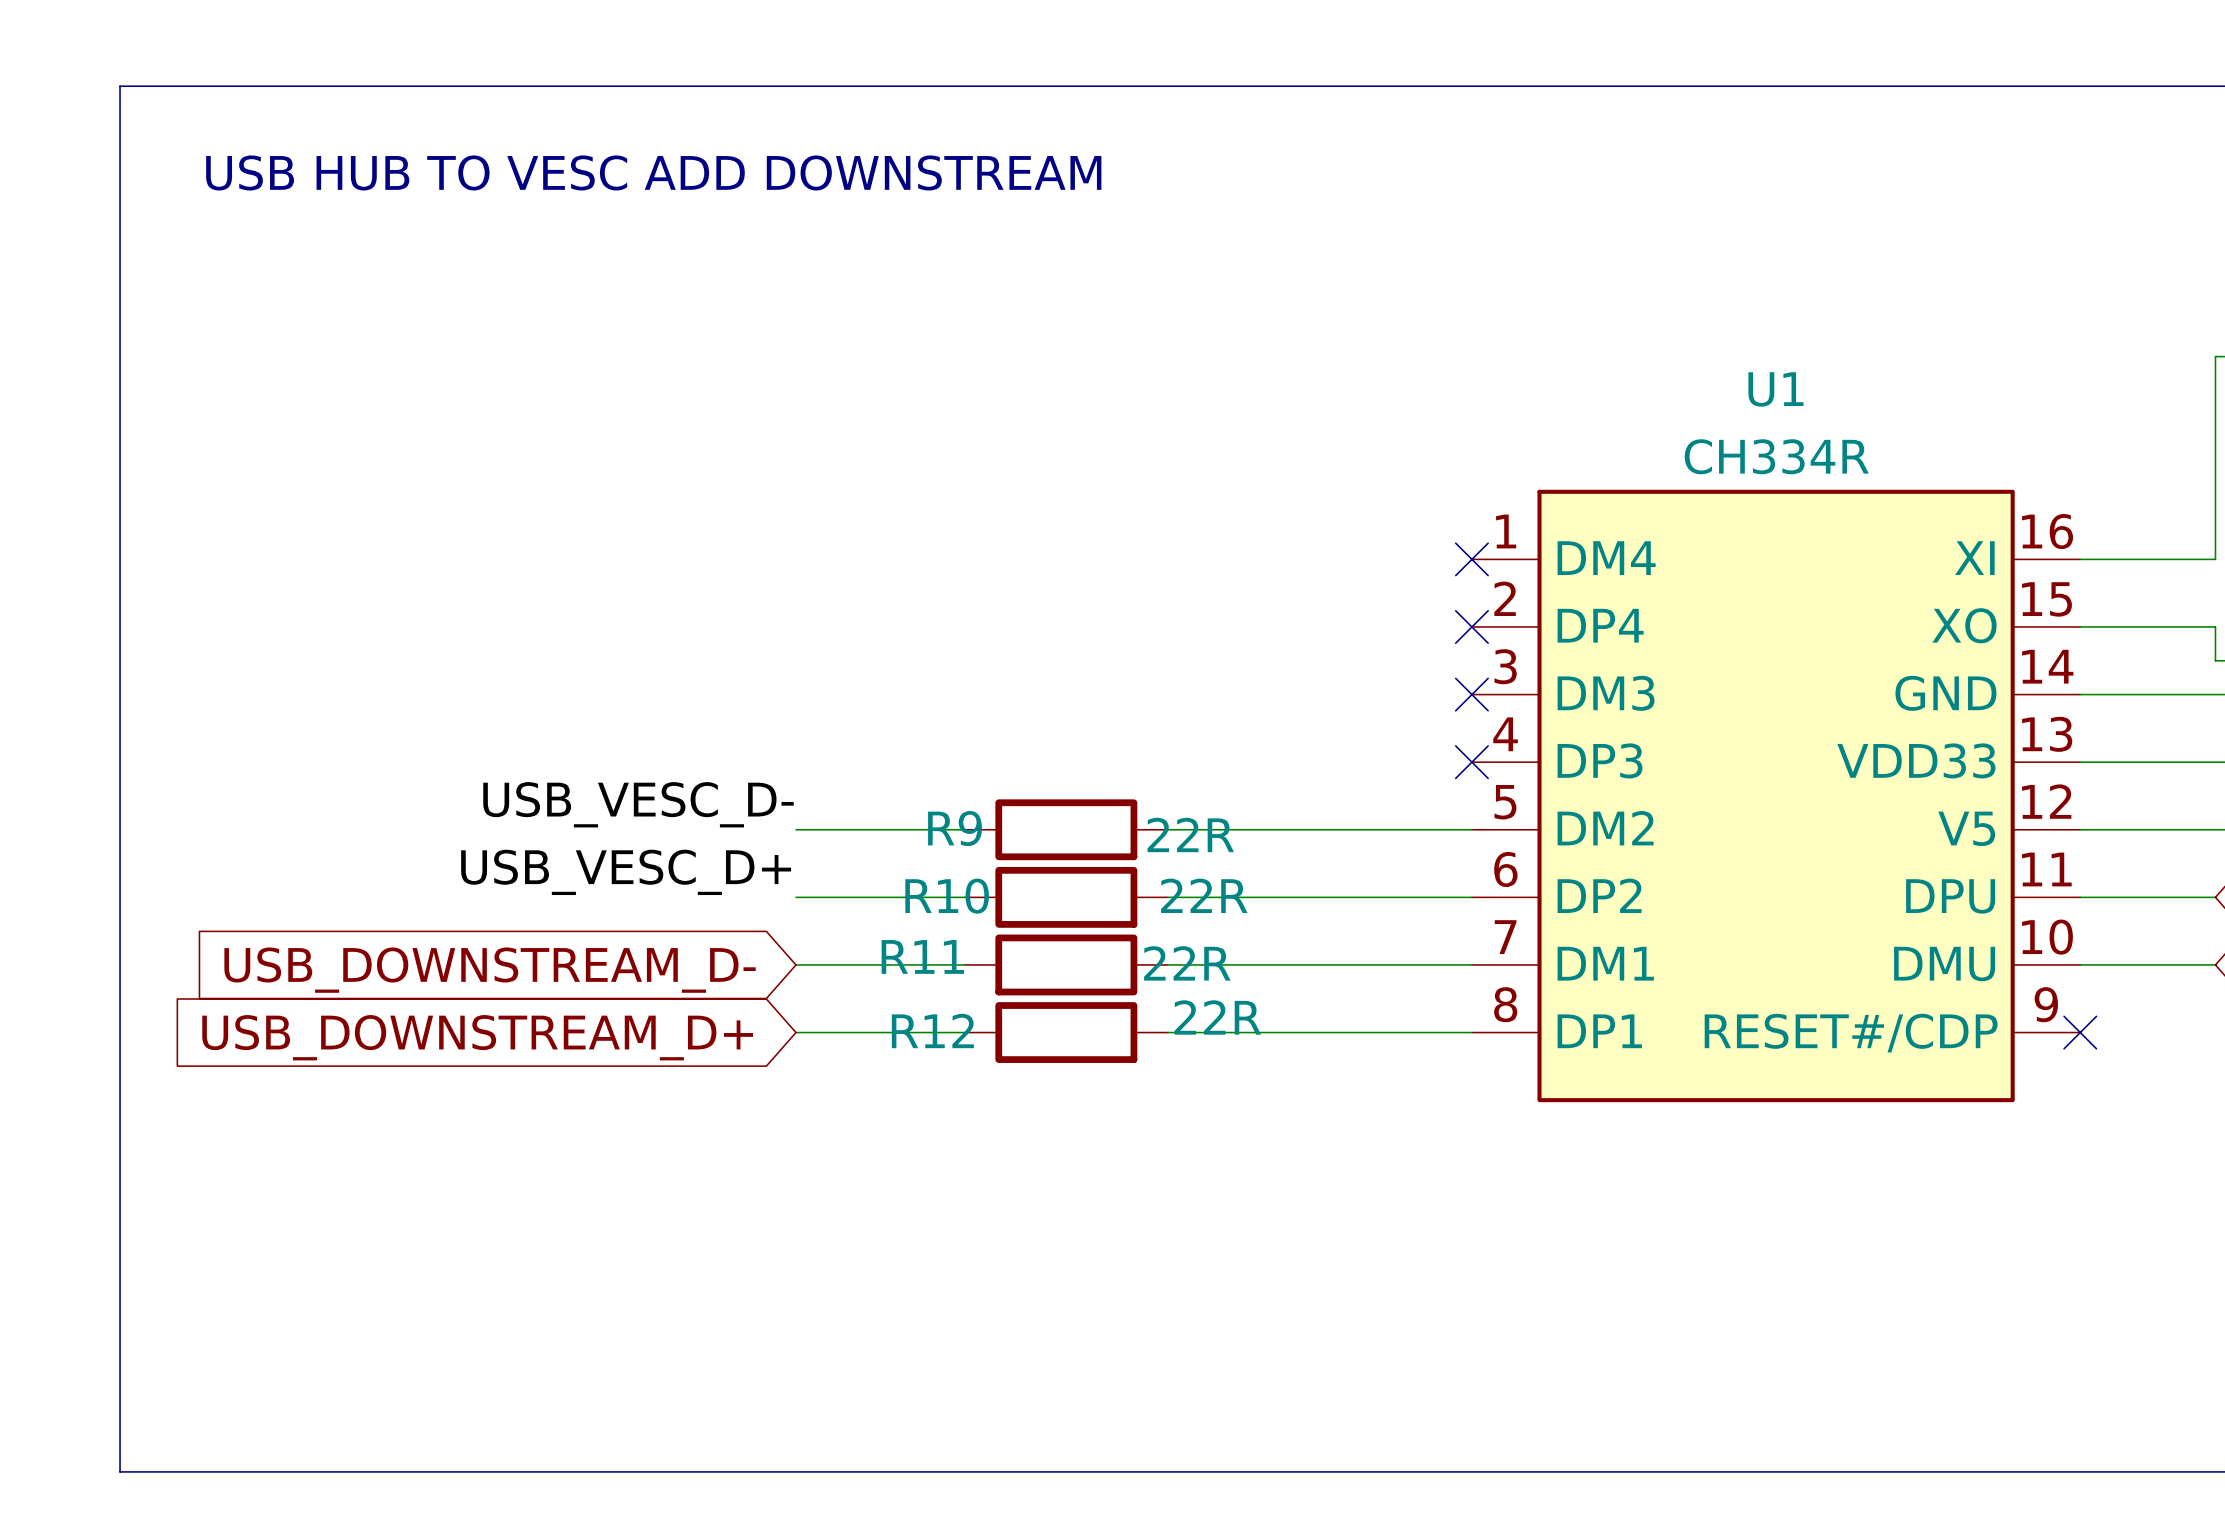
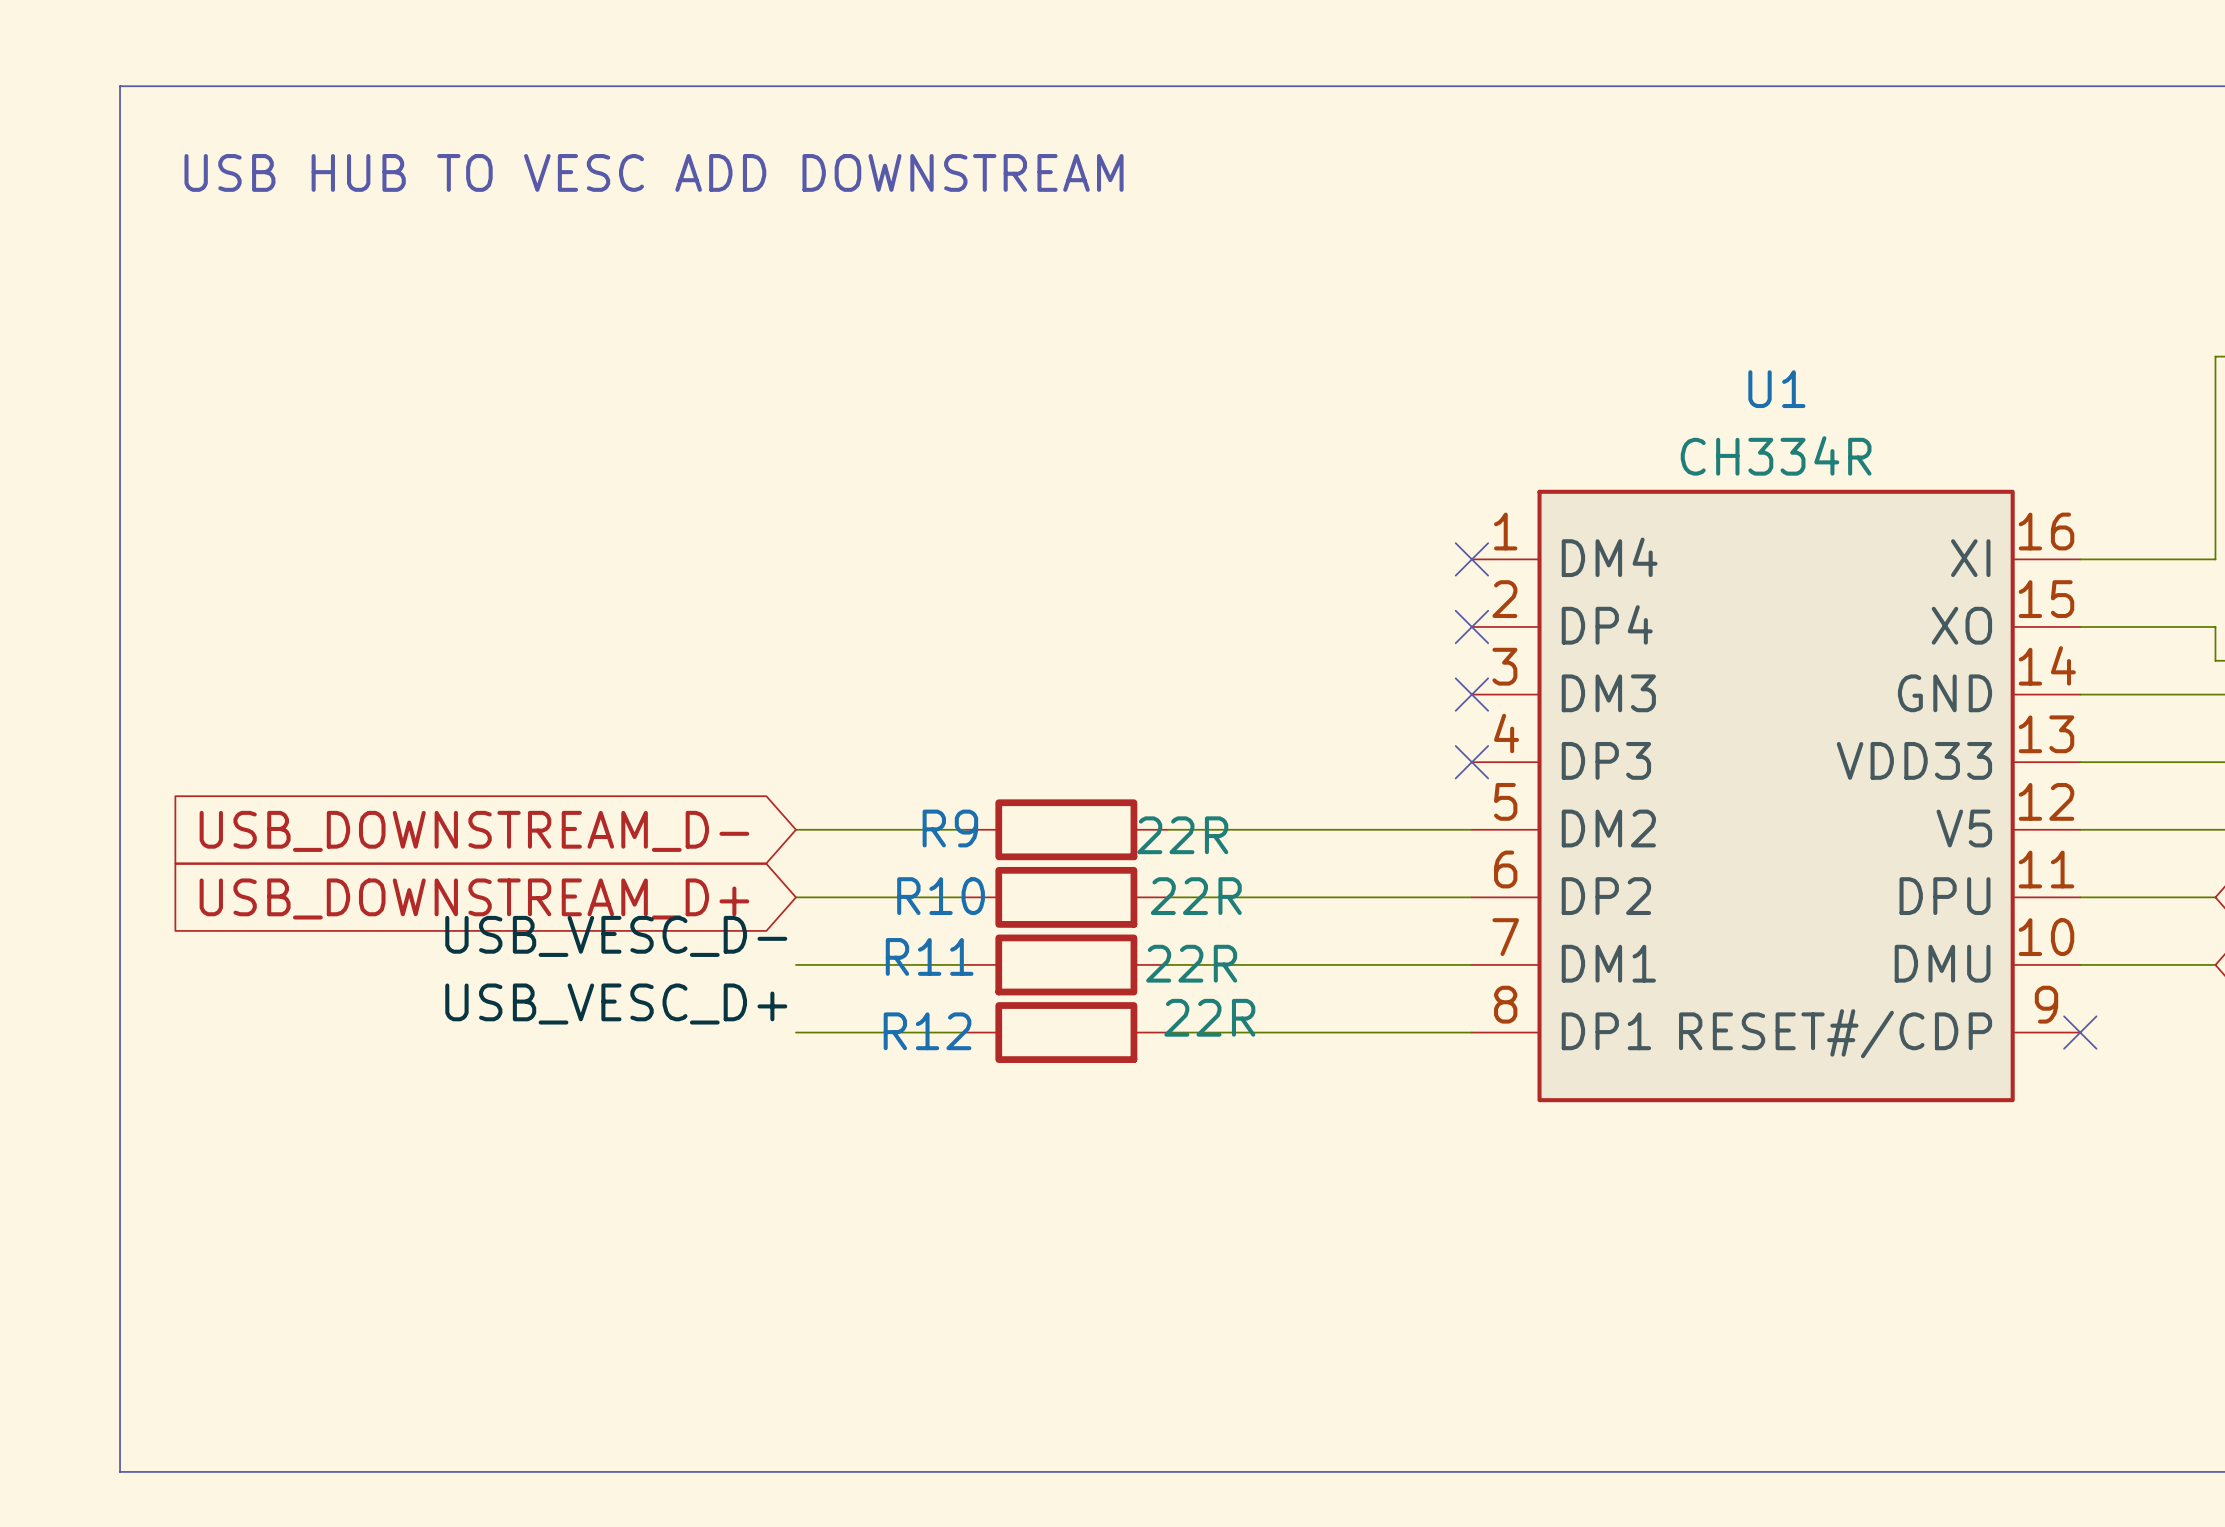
label position: USB_VESC_D- (638, 804) -> USB_VESC_D- (616, 936)
label position: USB_VESC_D+ (626, 872) -> USB_VESC_D+ (616, 1004)
global label position: USB_DOWNSTREAM_D- (490, 970) -> USB_DOWNSTREAM_D- (474, 831)
global label position: USB_DOWNSTREAM_D+ (477, 1037) -> USB_DOWNSTREAM_D+ (474, 898)

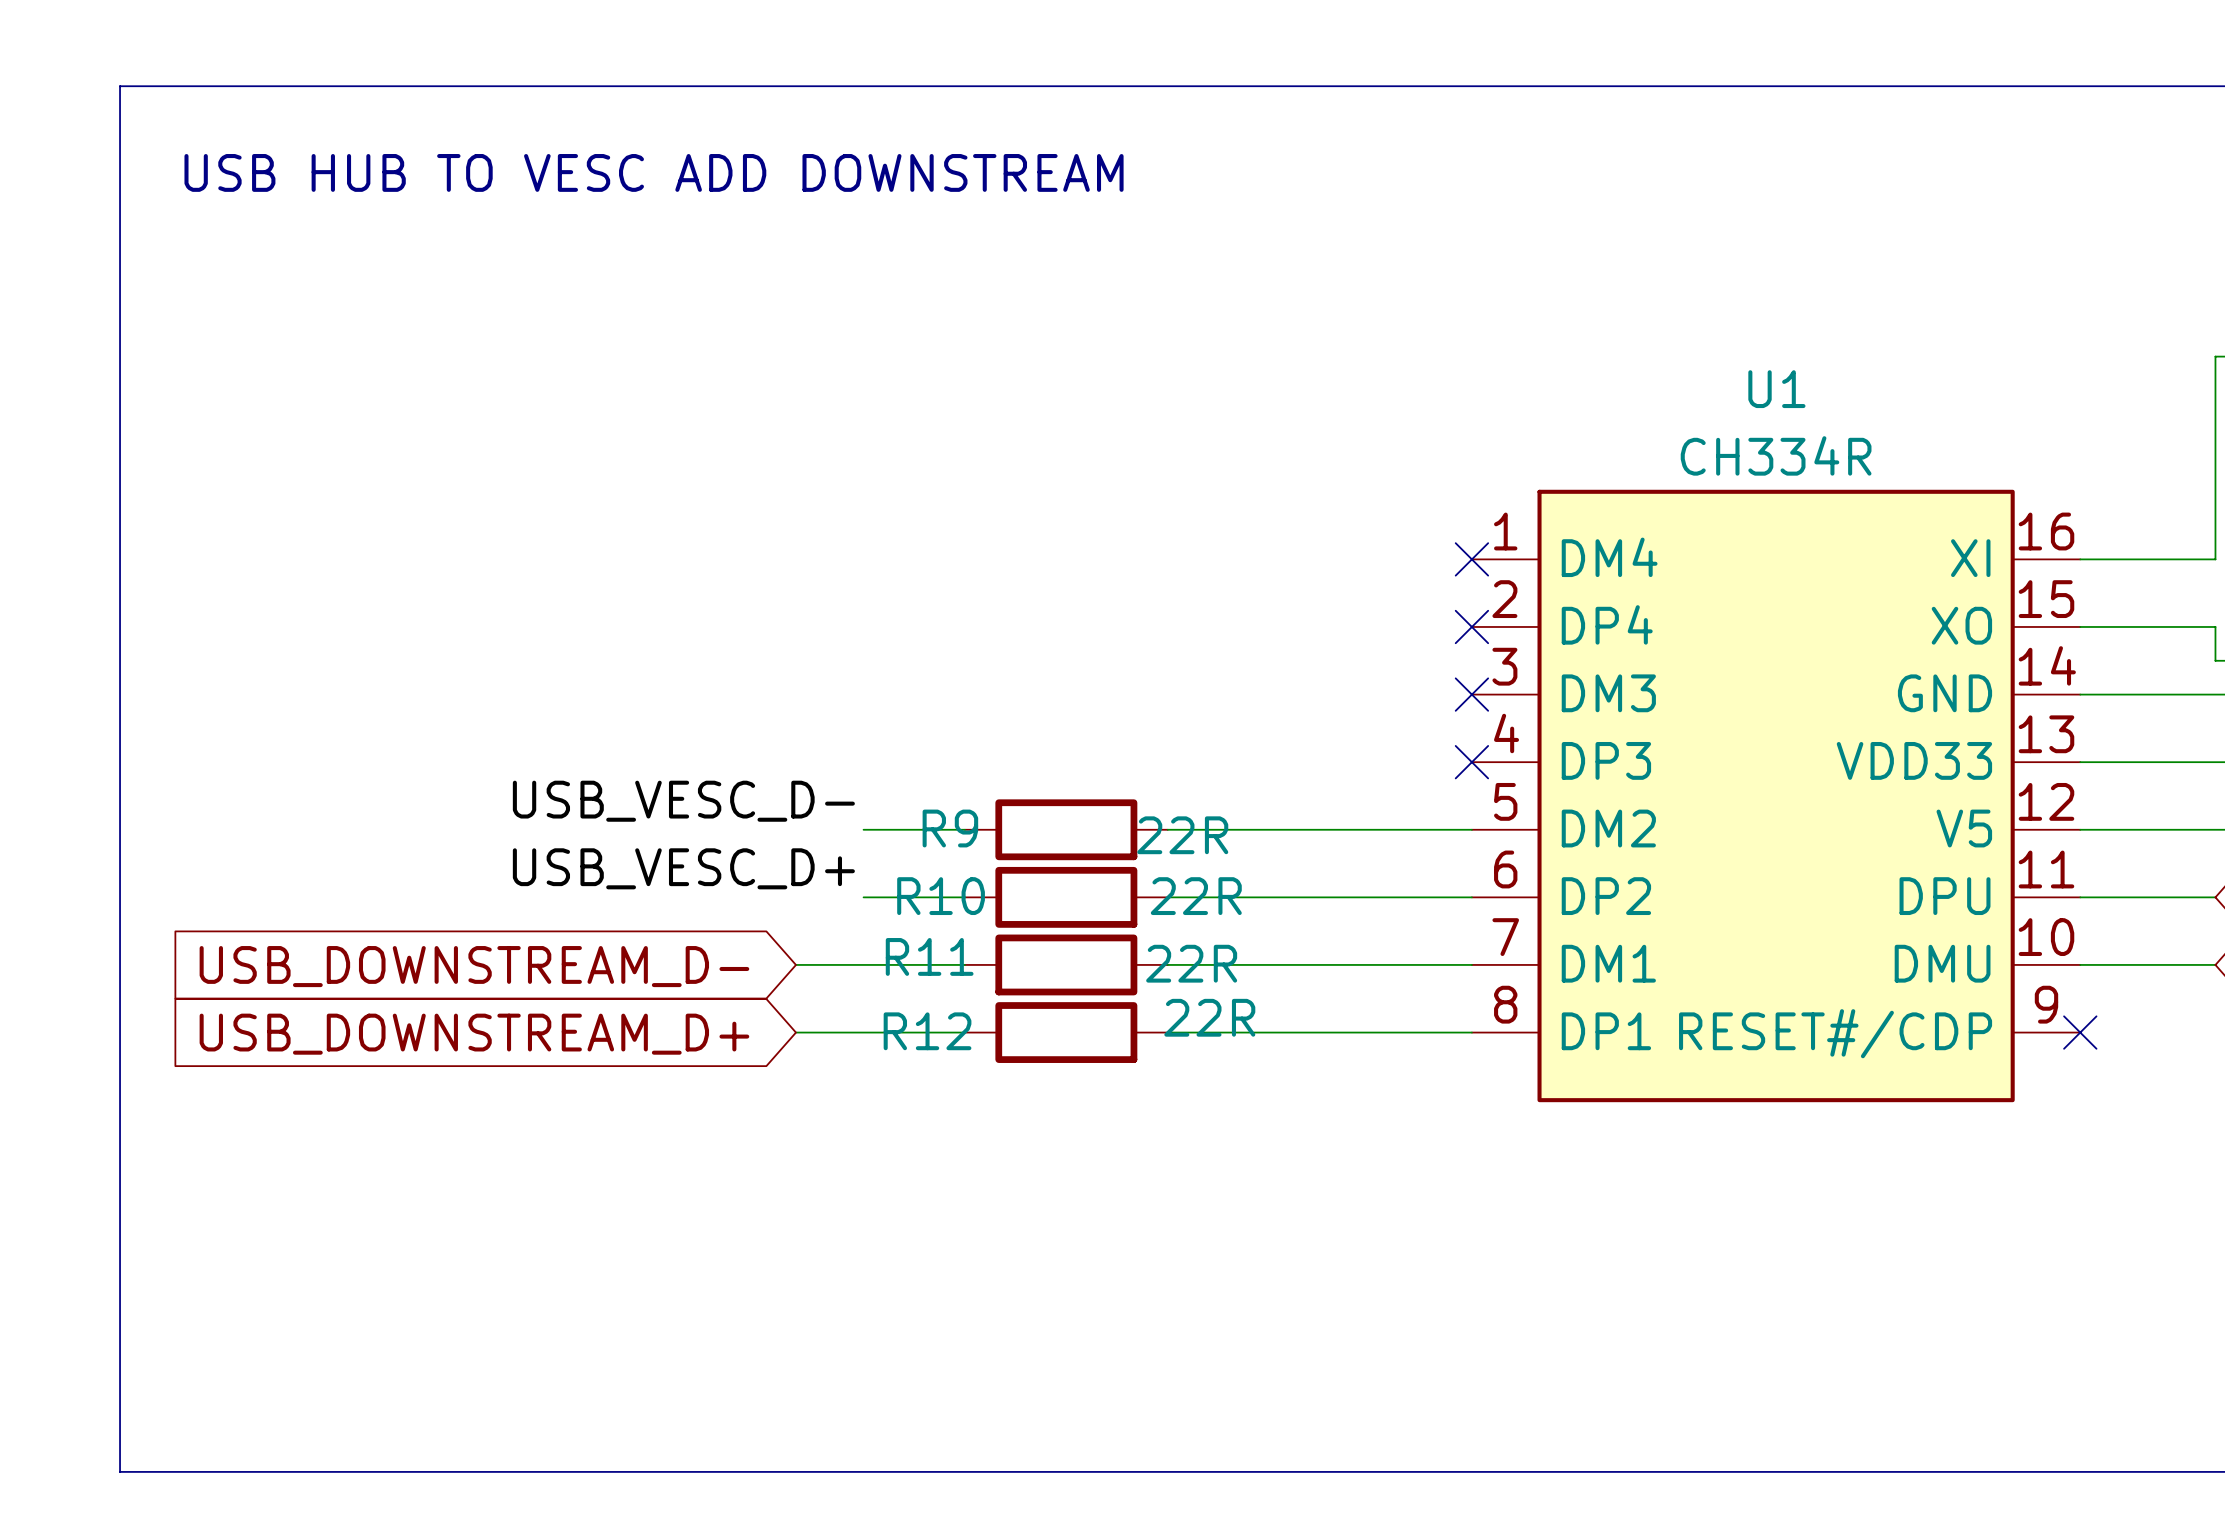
wire: (795, 829) (863, 829) -> none
global label position: USB_DOWNSTREAM_D- (474, 831) -> USB_DOWNSTREAM_D- (474, 966)
wire: (795, 897) (863, 897) -> none
global label position: USB_DOWNSTREAM_D+ (474, 898) -> USB_DOWNSTREAM_D+ (474, 1034)
label position: USB_VESC_D- (616, 936) -> USB_VESC_D- (683, 801)
label position: USB_VESC_D+ (616, 1004) -> USB_VESC_D+ (683, 868)

